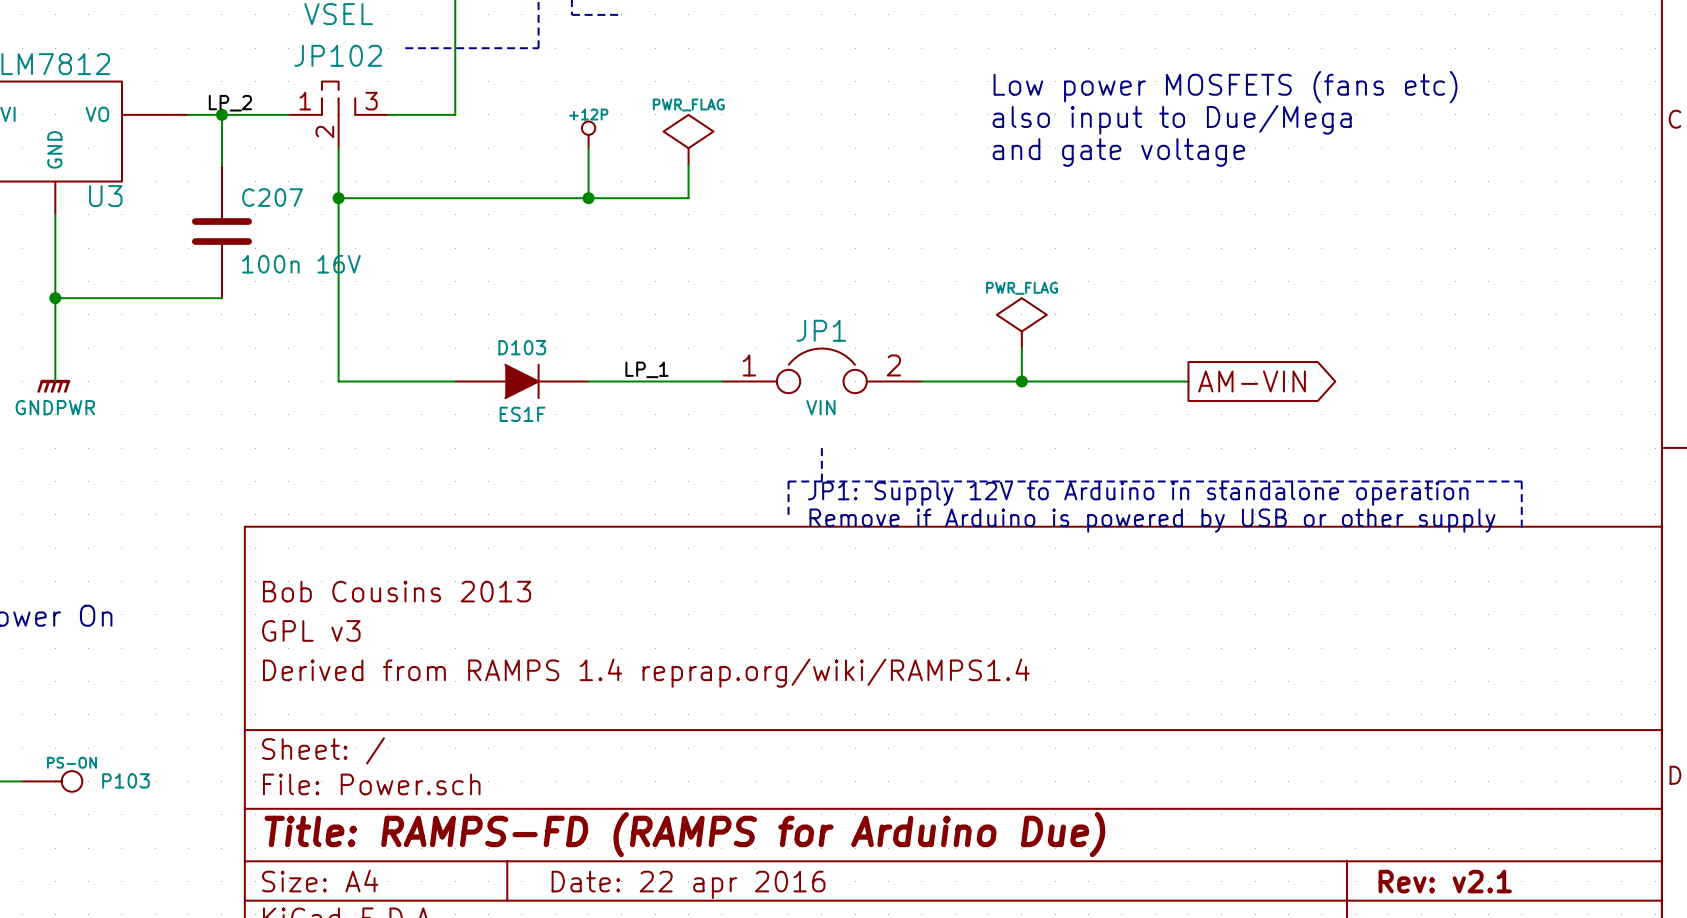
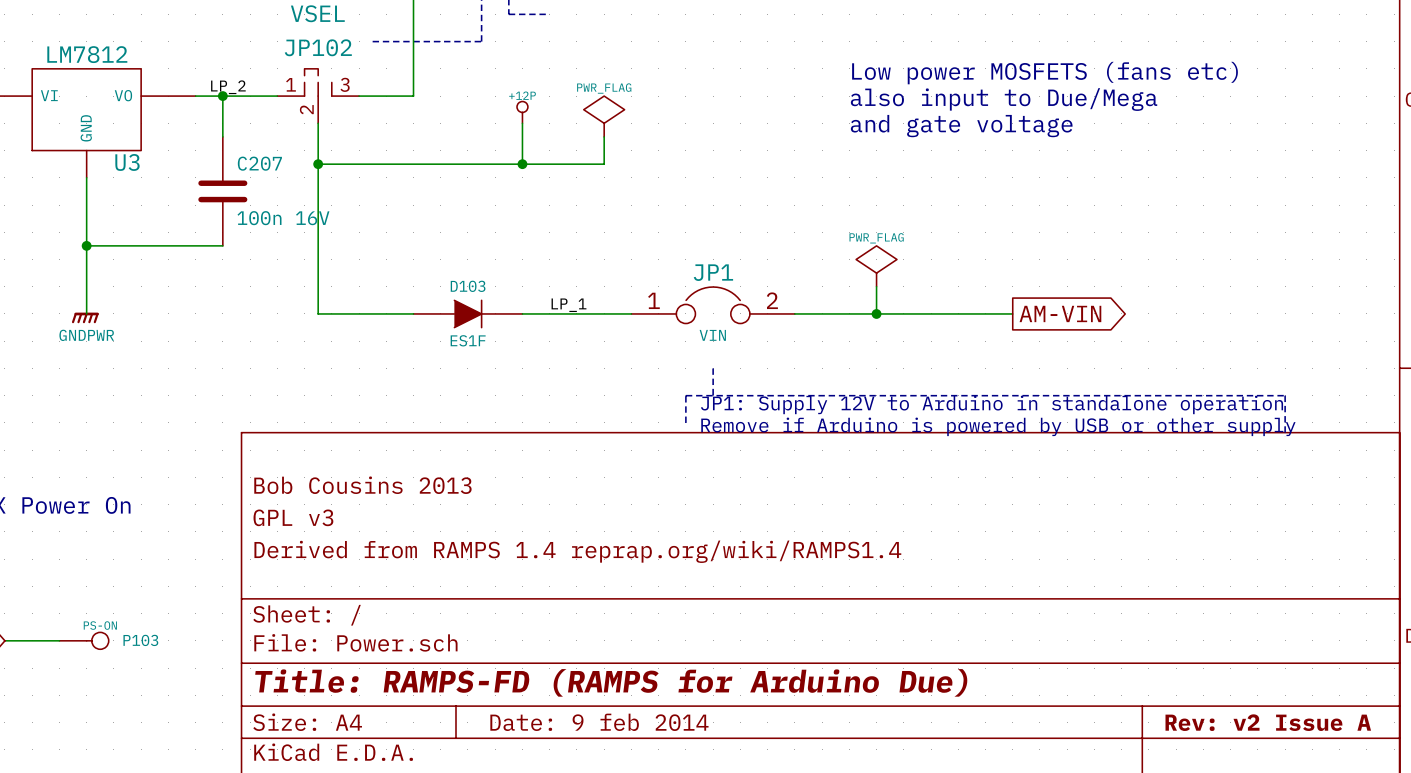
title block: Rev: v2.1 (1445, 881) -> Rev: v2 Issue A (1268, 722)
title block: Date: 22 apr 2016 (688, 884) -> Date: 9 feb 2014 (599, 722)

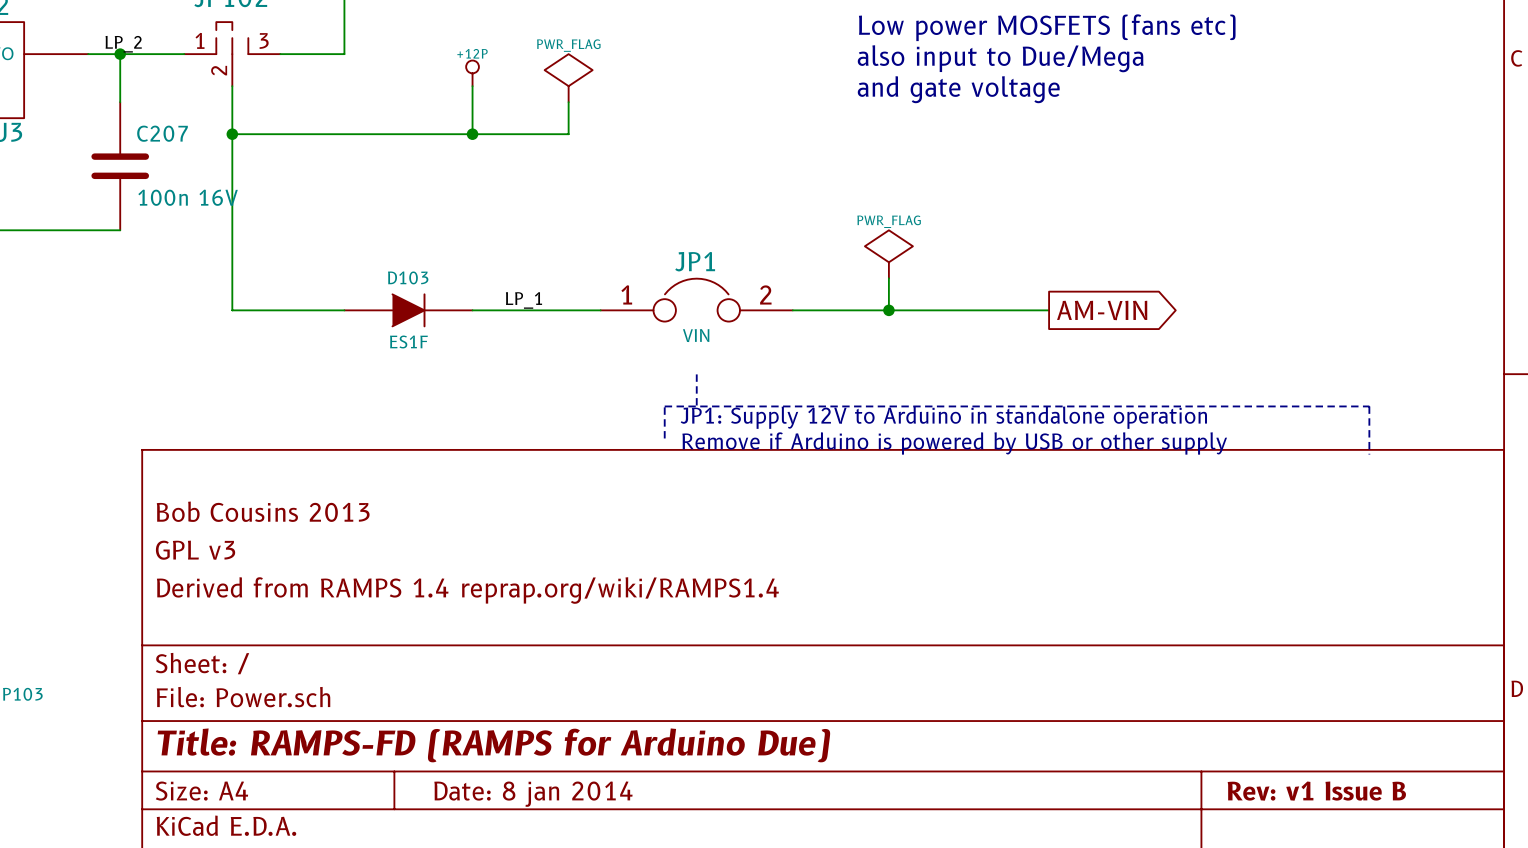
title block: Date: 9 feb 2014 (599, 722) -> Date: 8 jan 2014 (533, 794)
title block: Rev: v2 Issue A (1268, 722) -> Rev: v1 Issue B (1316, 791)

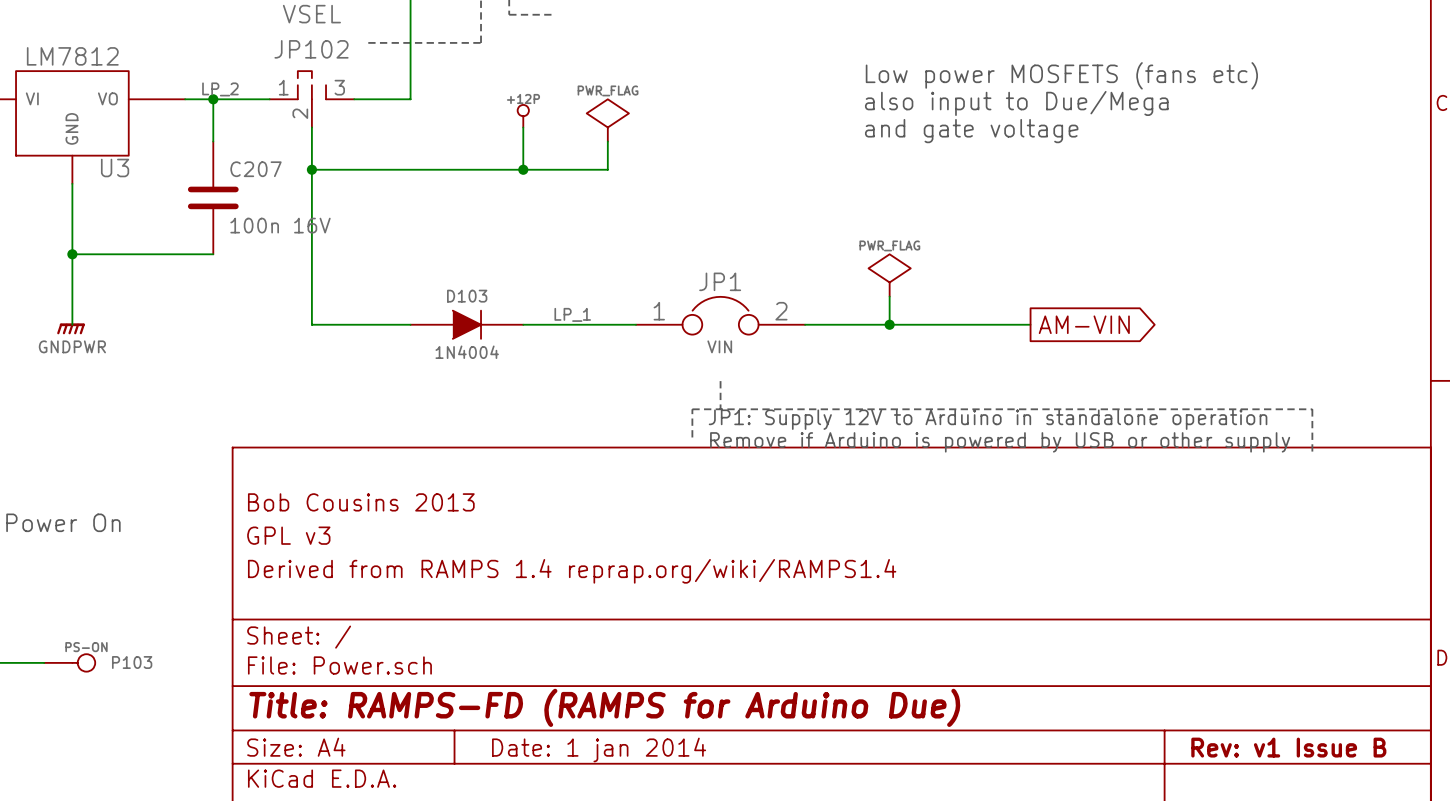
D103 value: ES1F (408, 341) -> 1N4004 (467, 352)
title block: Date: 8 jan 2014 (533, 794) -> Date: 1 jan 2014 (599, 749)

